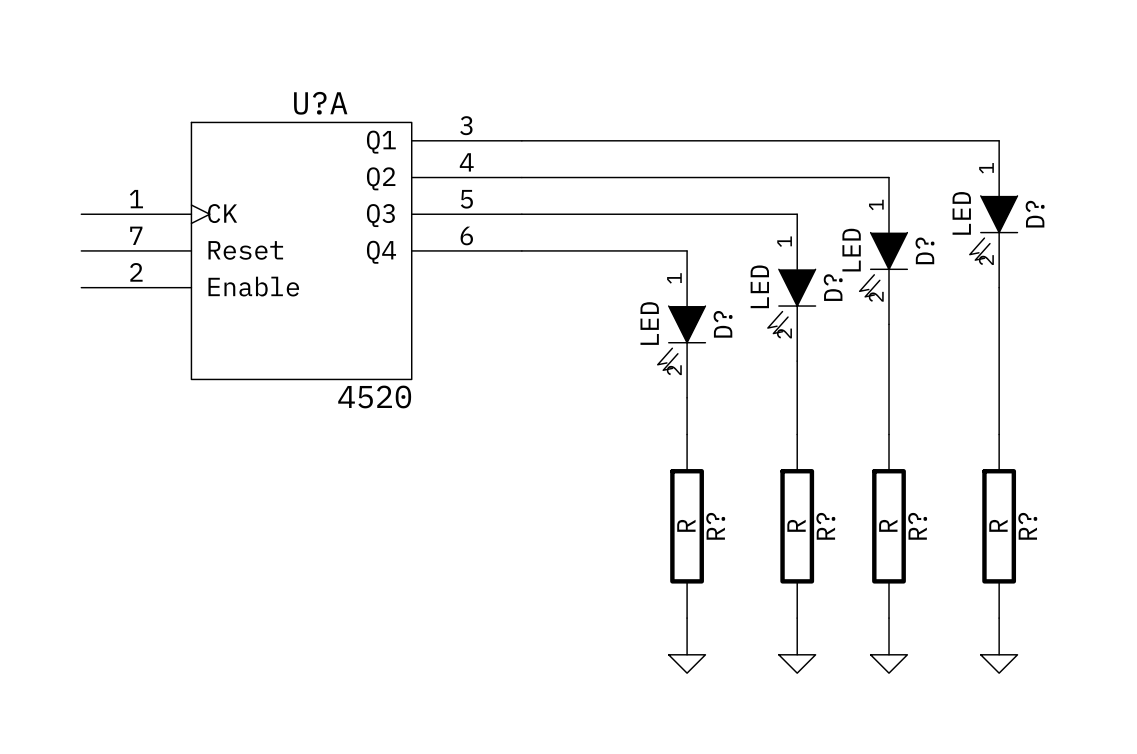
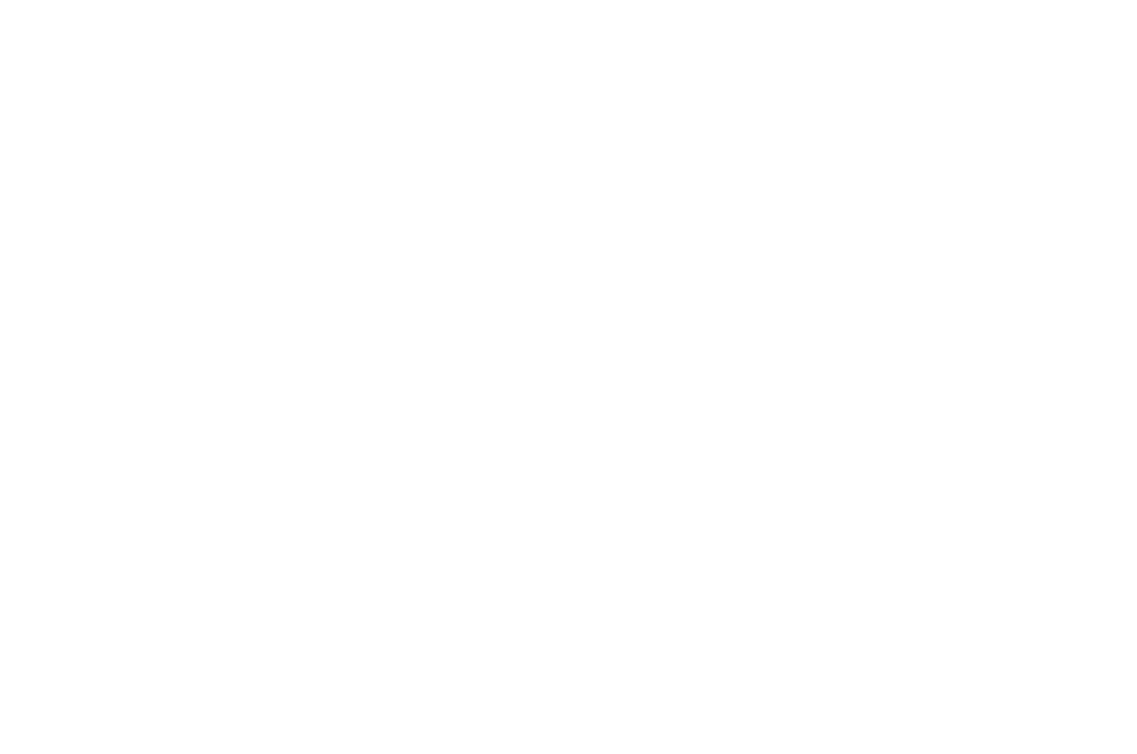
wire: (521, 140) (999, 140) -> none
wire: (521, 177) (889, 177) -> none
wire: (521, 214) (797, 214) -> none
D?: LED (993, 214) -> none
U?A: 4520 (301, 250) -> none
wire: (521, 250) (687, 250) -> none
D?: LED (883, 250) -> none
D?: LED (791, 287) -> none
wire: (999, 287) (999, 434) -> none
D?: LED (681, 324) -> none
wire: (889, 324) (889, 434) -> none
wire: (797, 361) (797, 434) -> none
wire: (687, 397) (687, 434) -> none
R?: R (687, 526) -> none
R?: R (797, 526) -> none
R?: R (889, 526) -> none
R?: R (999, 526) -> none
wire: (687, 618) (687, 654) -> none
wire: (797, 618) (797, 654) -> none
wire: (889, 618) (889, 654) -> none
wire: (999, 618) (999, 654) -> none
power symbol: (687, 663) -> none
power symbol: (797, 663) -> none
power symbol: (889, 663) -> none
power symbol: (999, 663) -> none

